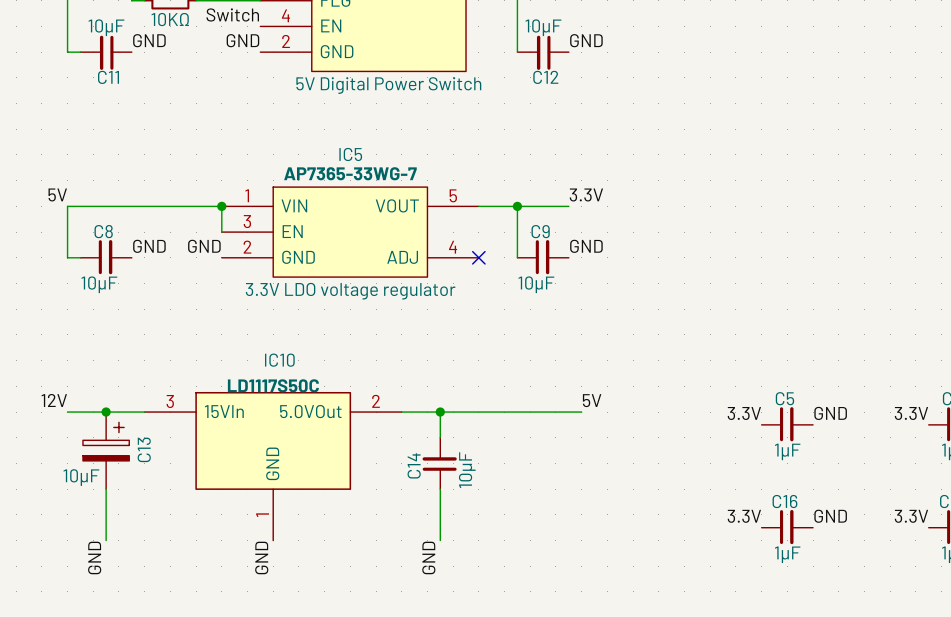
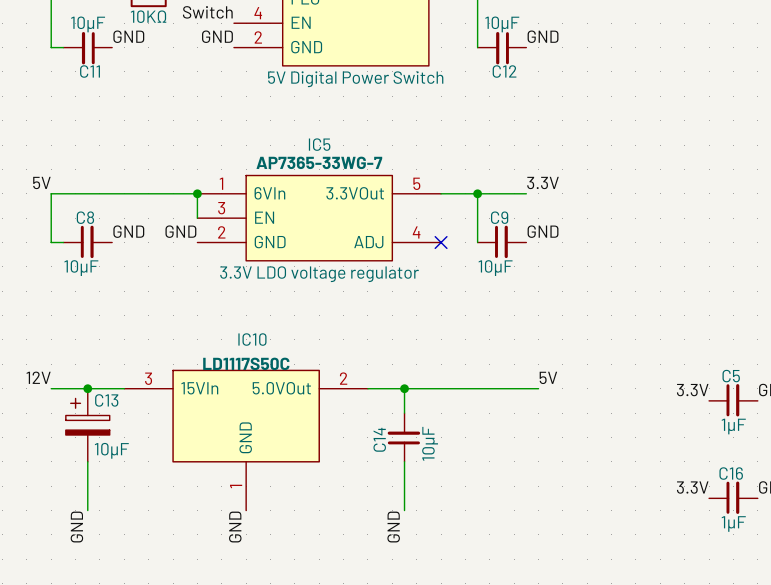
IC5 pin name: VIN (294, 205) -> 6VIn (269, 193)
IC5 pin name: VOUT (397, 205) -> 3.3VOut (355, 193)
C13 flip: as is (106, 441) -> left-right (87, 416)
C13 text: 10μF (81, 477) -> none
C13 value: none -> 10μF (111, 450)

